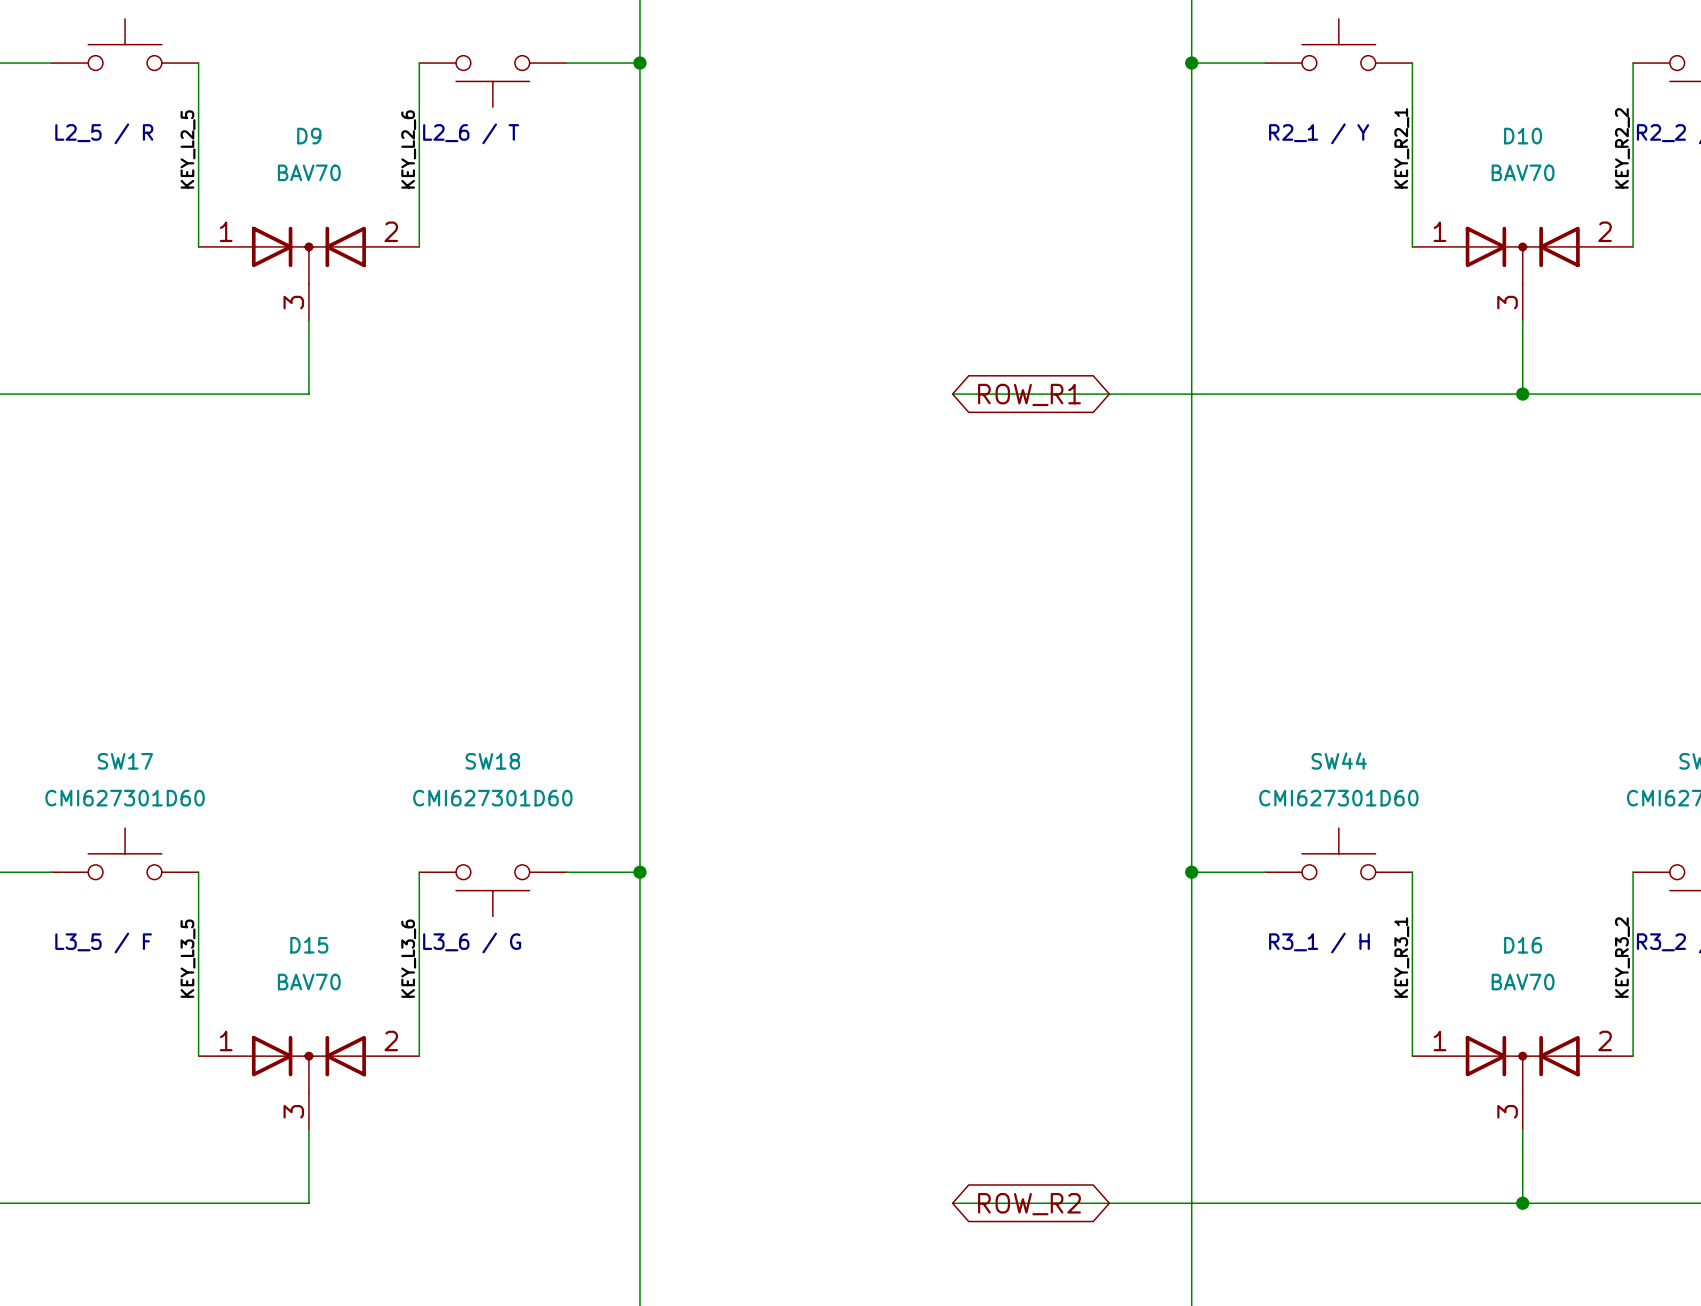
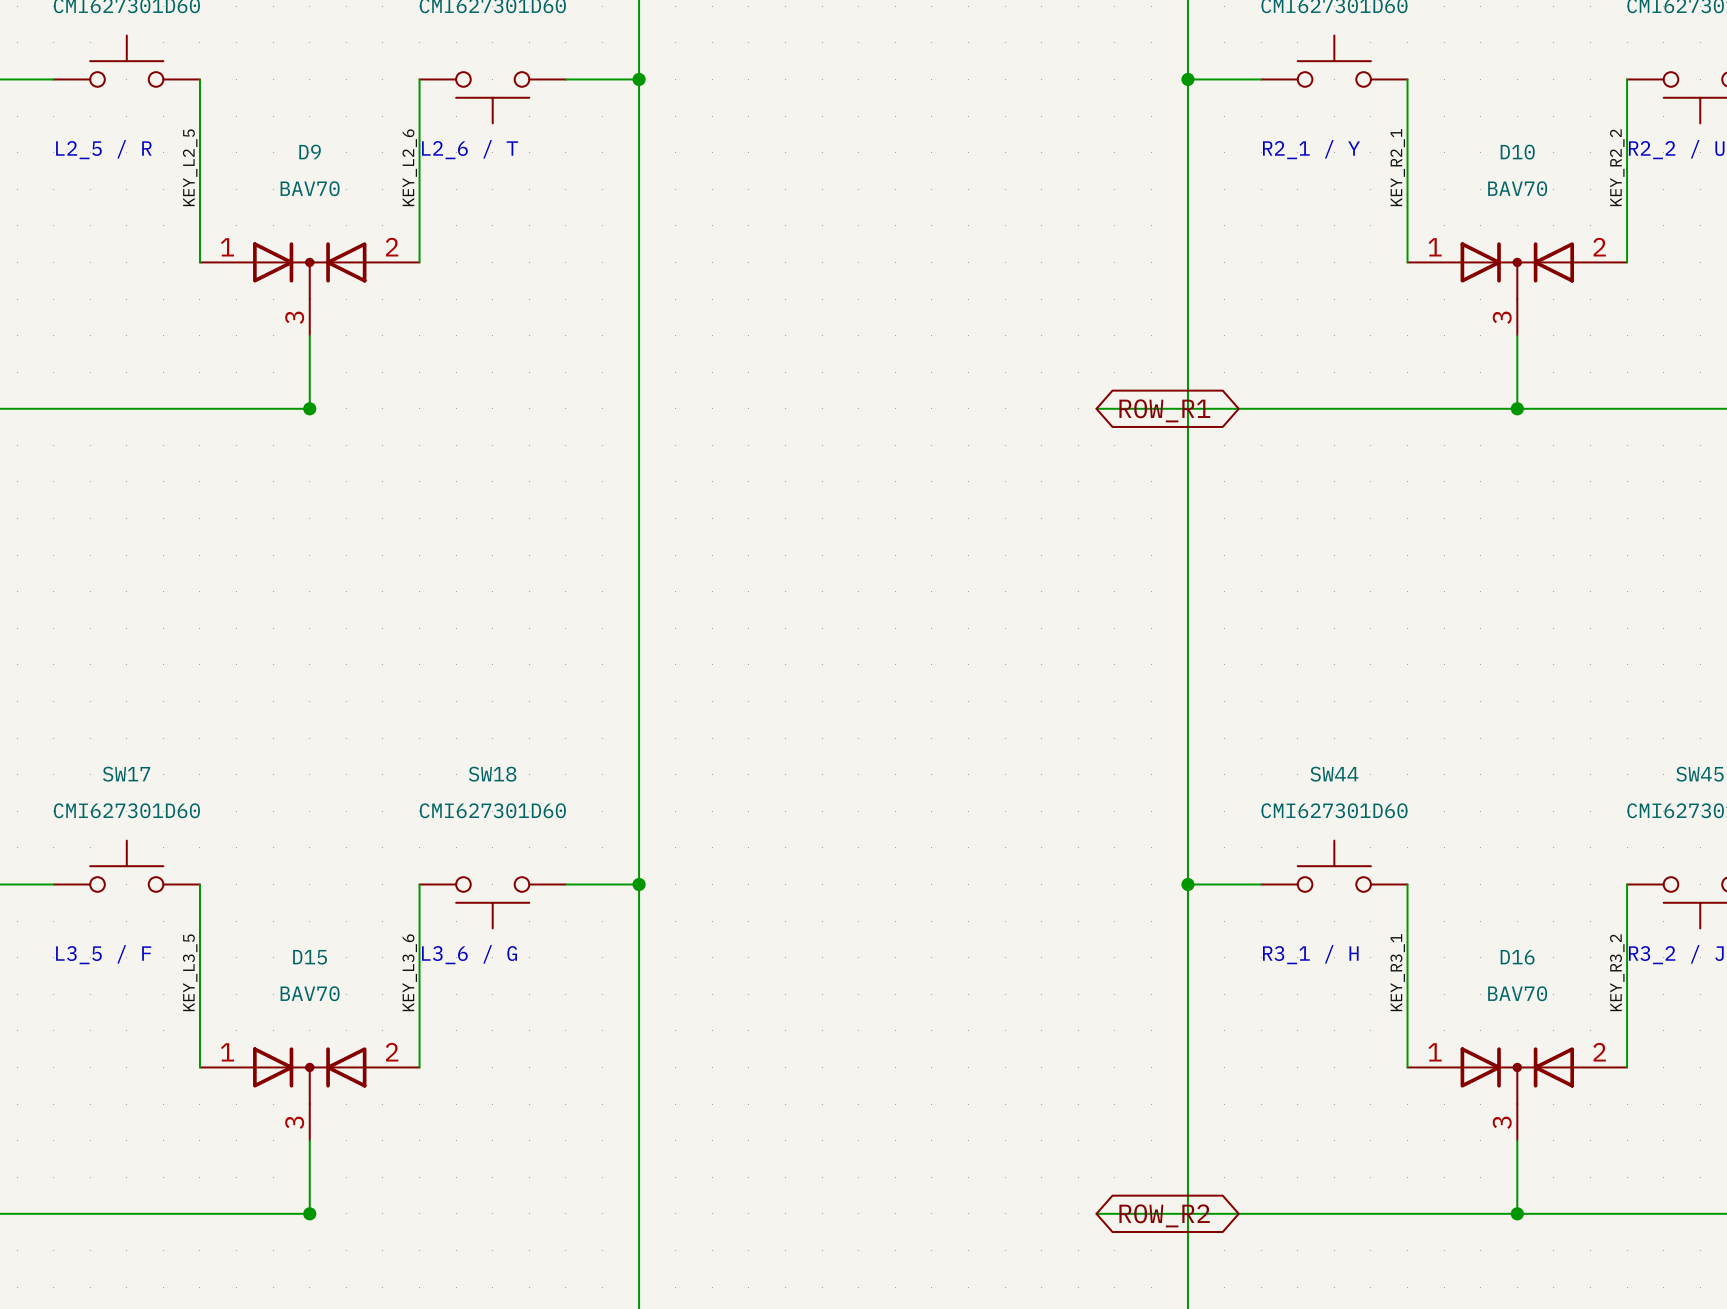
junction: none -> (309, 408)
wire: (952, 394) (1099, 394) -> none
global label position: ROW_R1 (1029, 394) -> ROW_R1 (1164, 410)
junction: none -> (309, 1213)
wire: (952, 1203) (1099, 1203) -> none
global label position: ROW_R2 (1029, 1204) -> ROW_R2 (1164, 1215)

